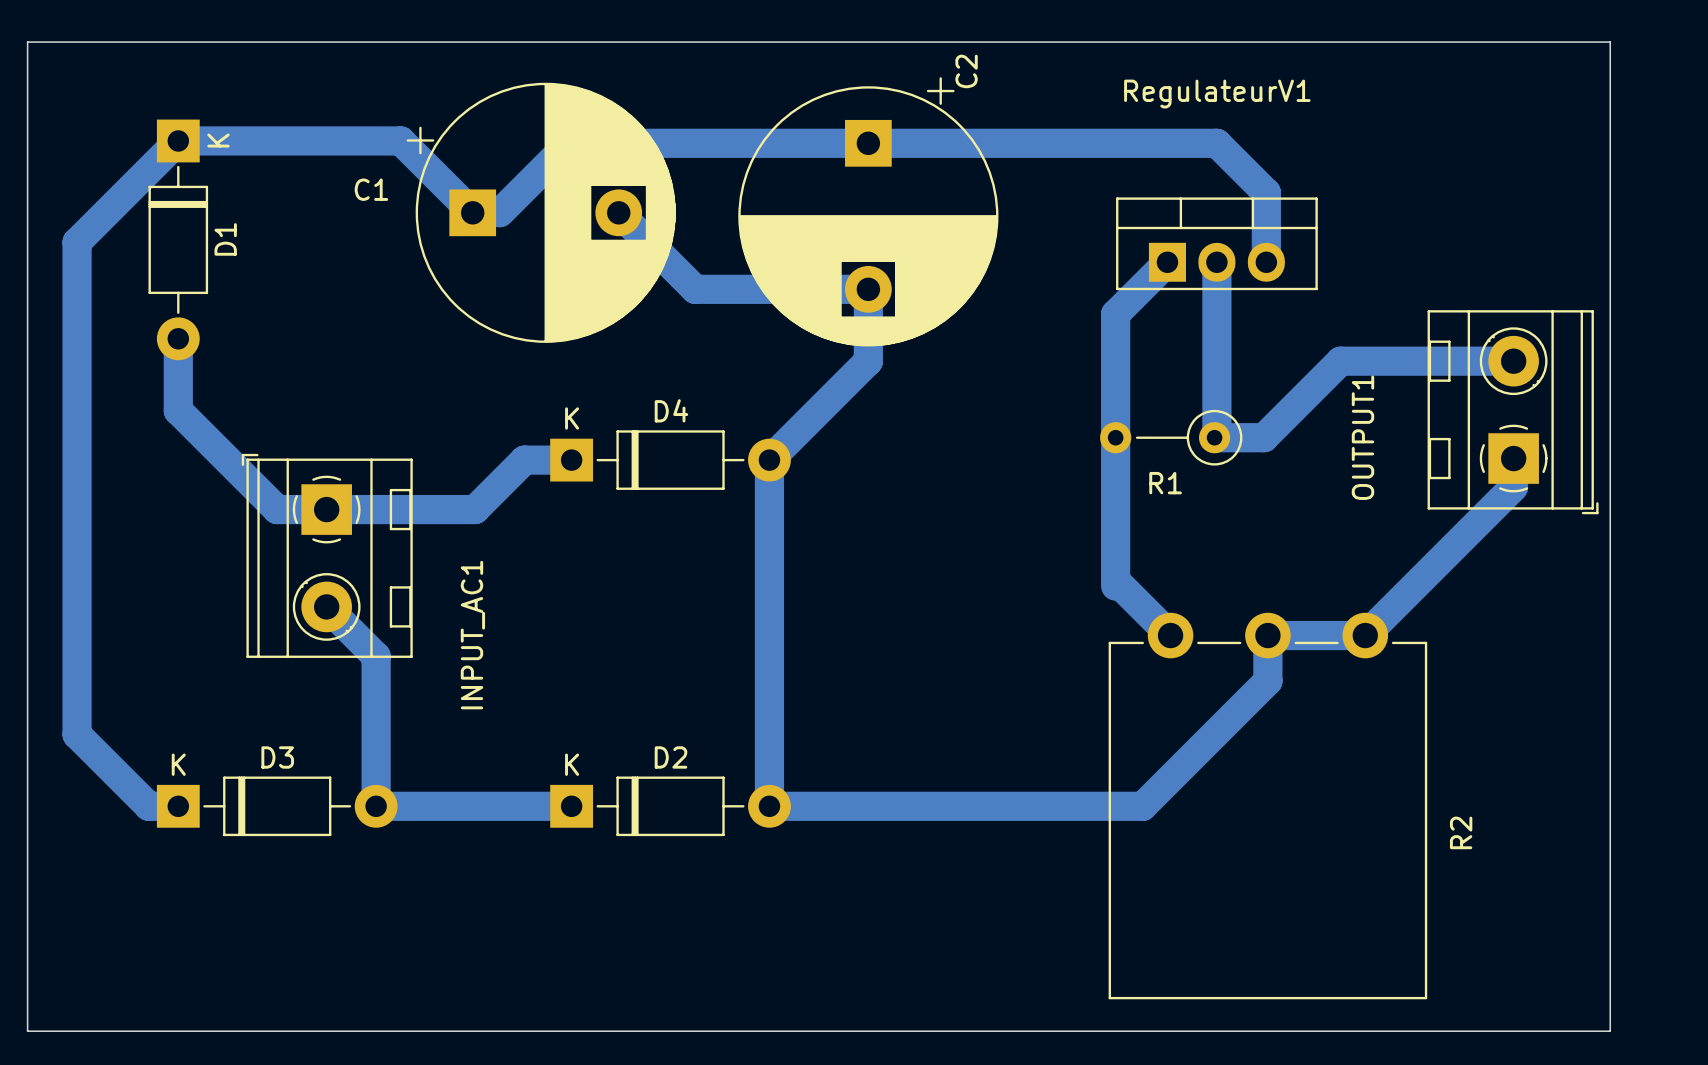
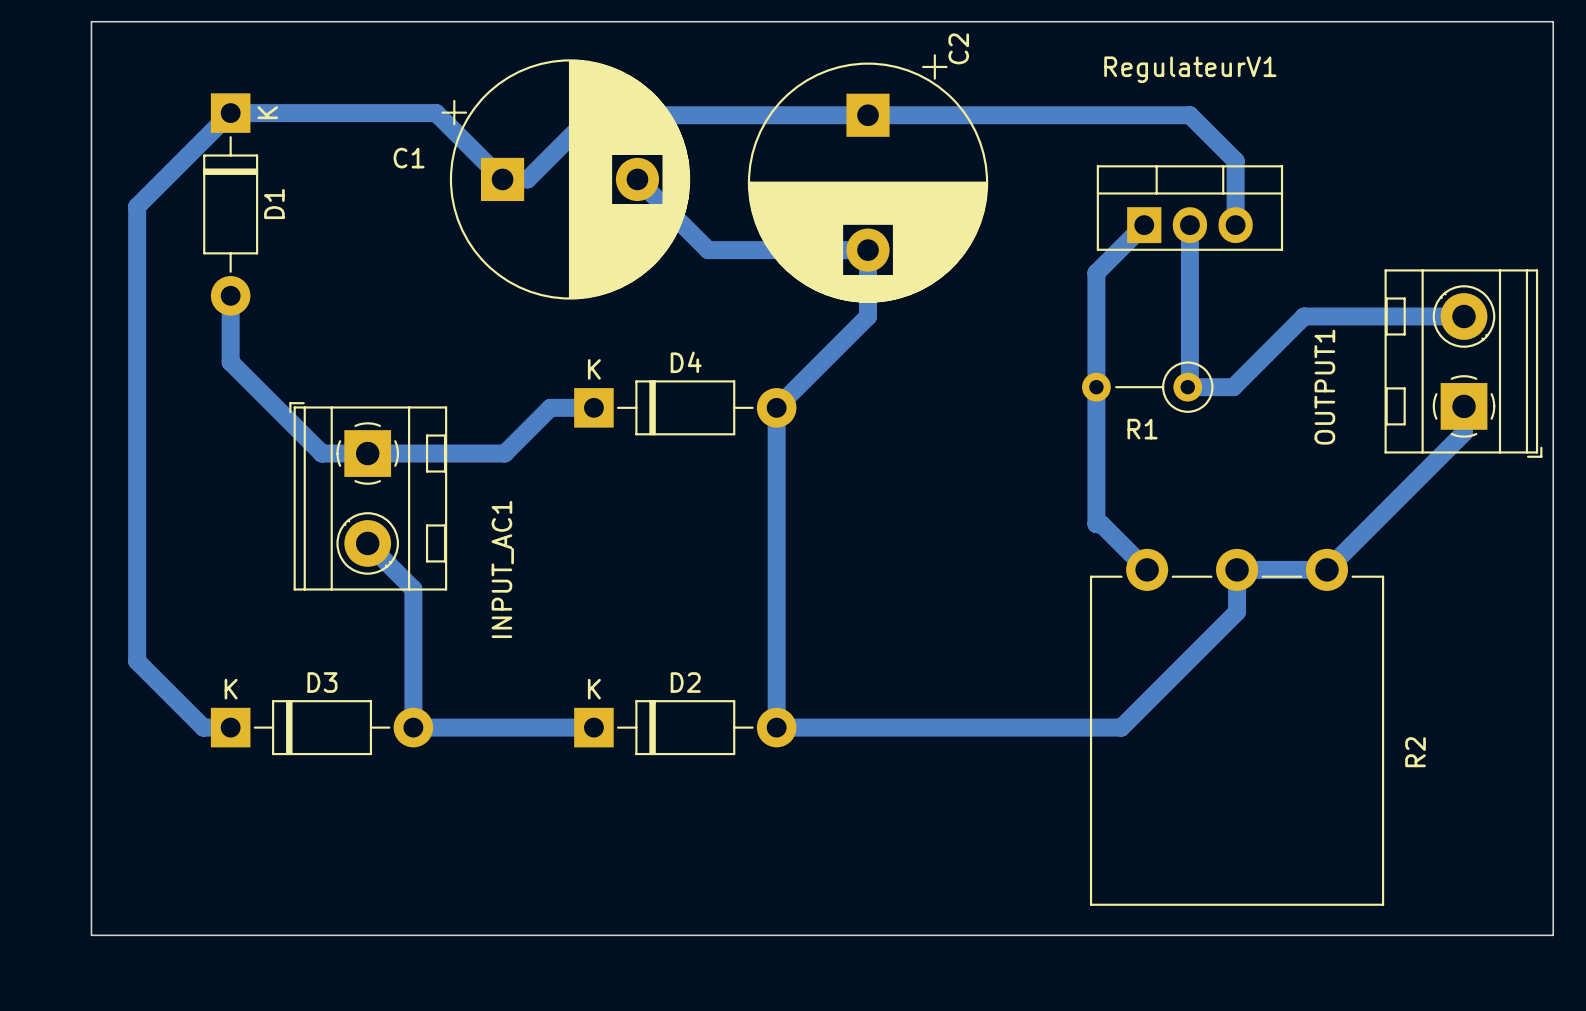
bottom track width: thick (571, 140) (499, 212) -> thin (593, 113) (527, 179)
bottom track width: thick (573, 143) (1216, 143) (1266, 192) (1266, 262) -> thin (596, 115) (1189, 115) (1235, 160) (1235, 225)
bottom track width: thick (472, 212) (400, 140) (178, 140) (77, 242) (77, 734) (148, 806) (178, 806) -> thin (502, 179) (436, 113) (230, 113) (137, 206) (137, 661) (203, 727) (230, 727)
bottom track width: thick (618, 212) (695, 289) (868, 289) (868, 361) (769, 460) (769, 806) (1142, 806) (1267, 681) (1267, 635) (1365, 635) (1513, 487) -> thin (637, 179) (708, 250) (868, 250) (868, 316) (776, 407) (776, 727) (1121, 727) (1237, 611) (1237, 569) (1326, 569) (1464, 432)
bottom track width: thick (1167, 262) (1115, 314) (1115, 586) -> thin (1144, 225) (1096, 272) (1096, 524)
bottom track width: thick (1216, 262) (1216, 435) -> thin (1189, 225) (1189, 385)
bottom track width: thick (178, 338) (178, 410) (277, 509) (475, 509) (524, 460) (571, 460) -> thin (230, 295) (230, 362) (322, 453) (504, 453) (550, 407) (593, 407)
bottom track width: thick (1513, 361) (1340, 361) (1264, 437) (1214, 437) -> thin (1464, 316) (1304, 316) (1233, 387) (1187, 387)
bottom track width: thick (1121, 586) (1170, 635) -> thin (1101, 524) (1147, 569)
bottom track width: thick (326, 606) (376, 656) (376, 806) (571, 806) -> thin (367, 543) (413, 589) (413, 727) (593, 727)

